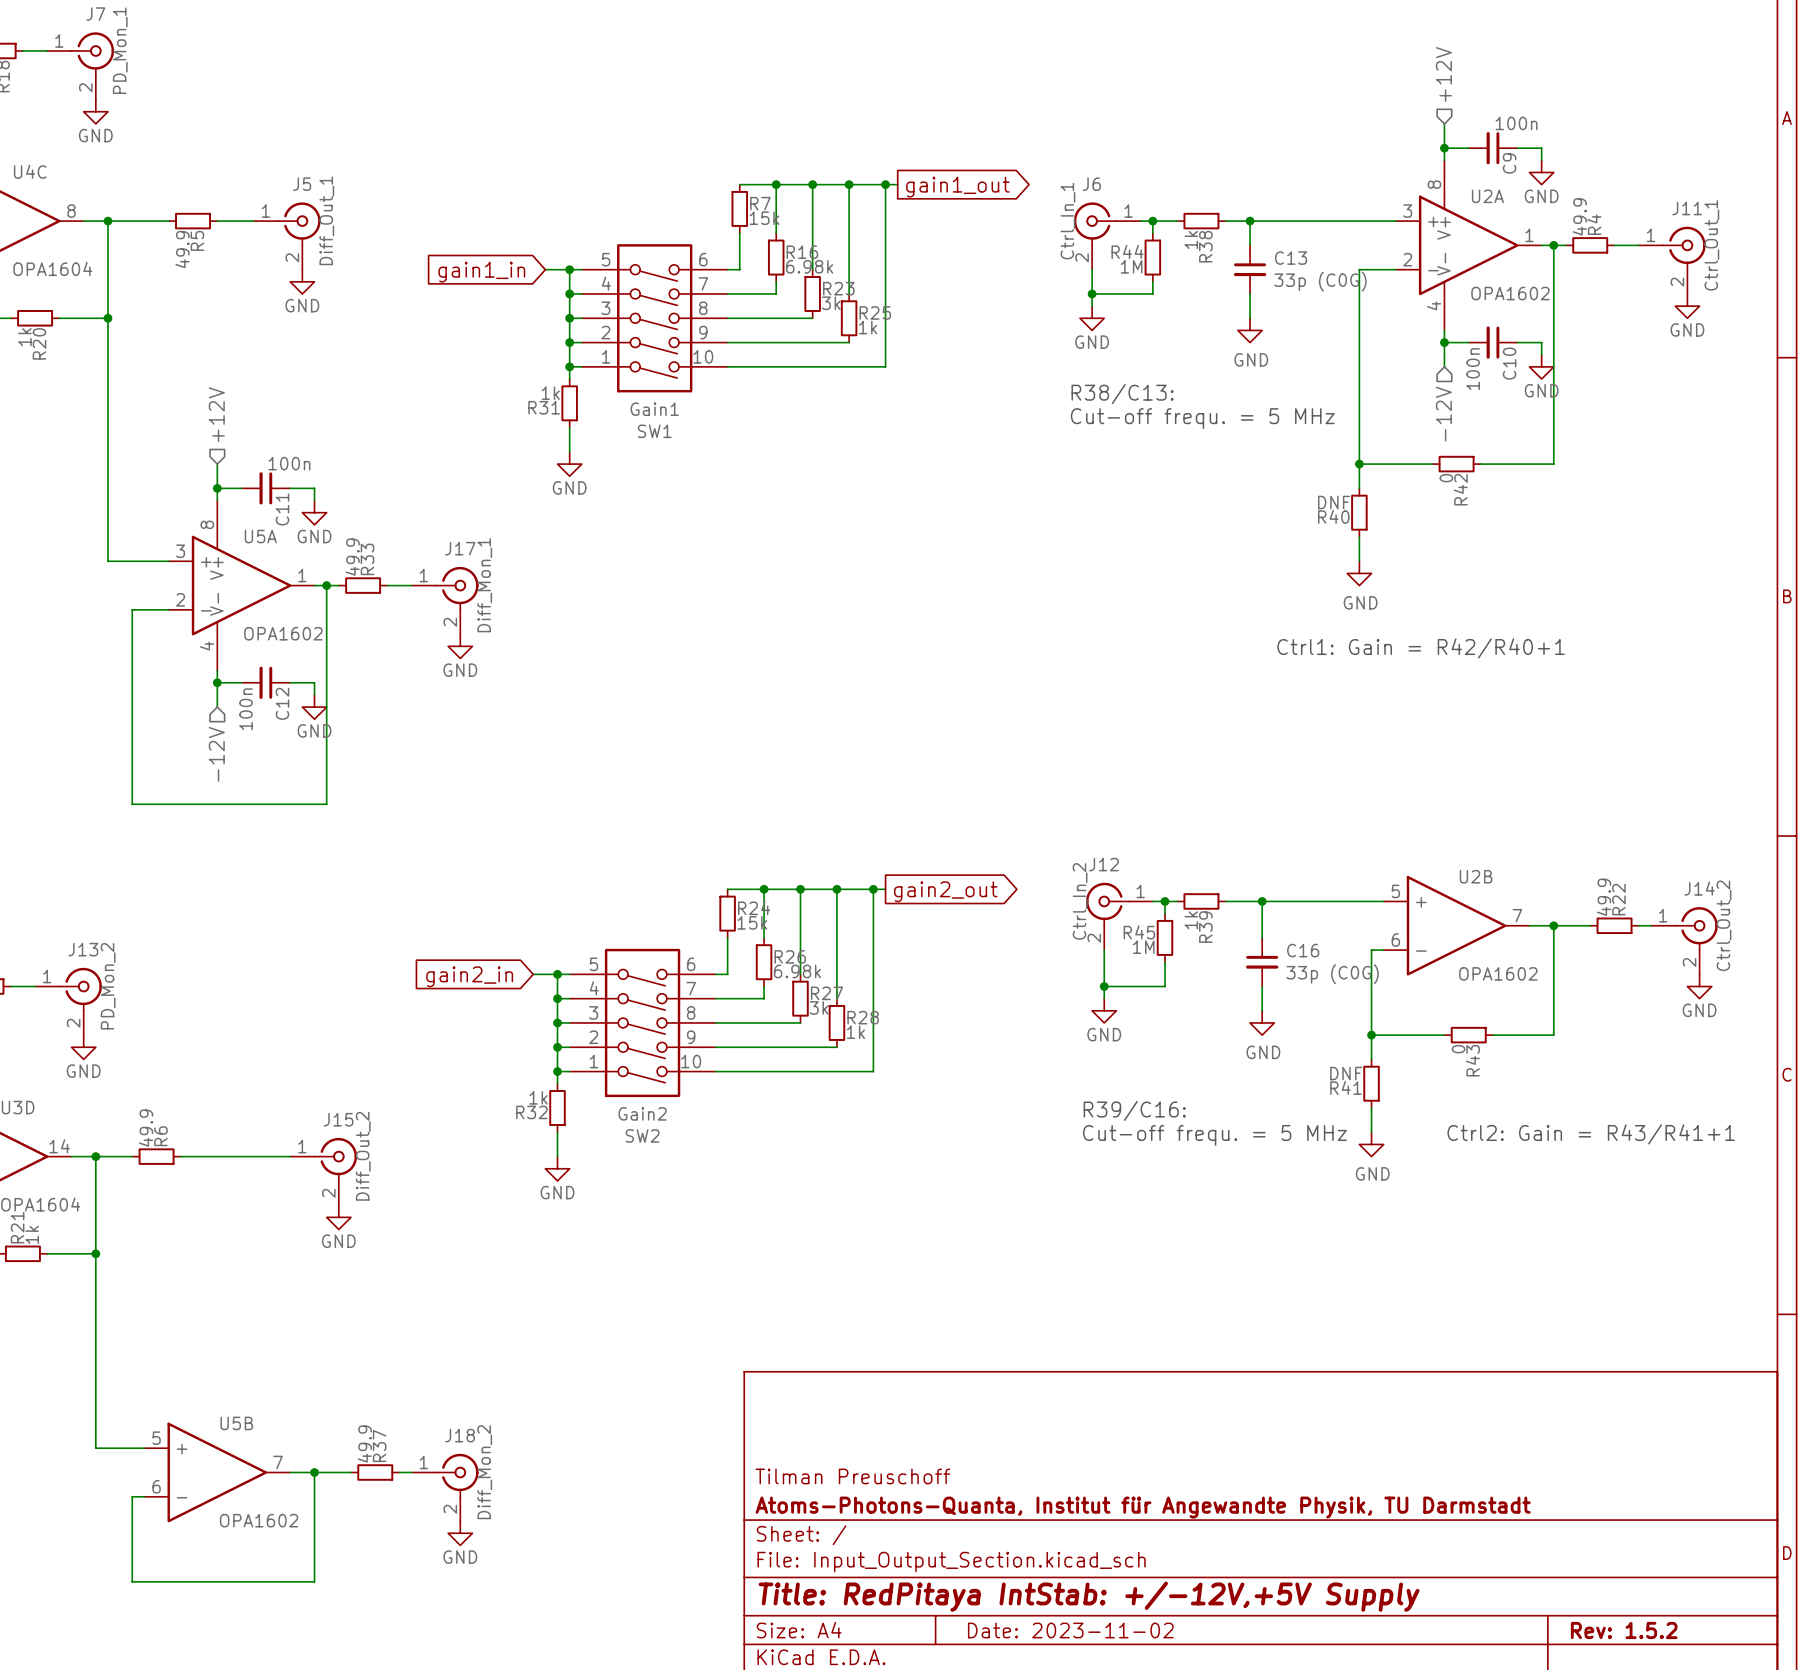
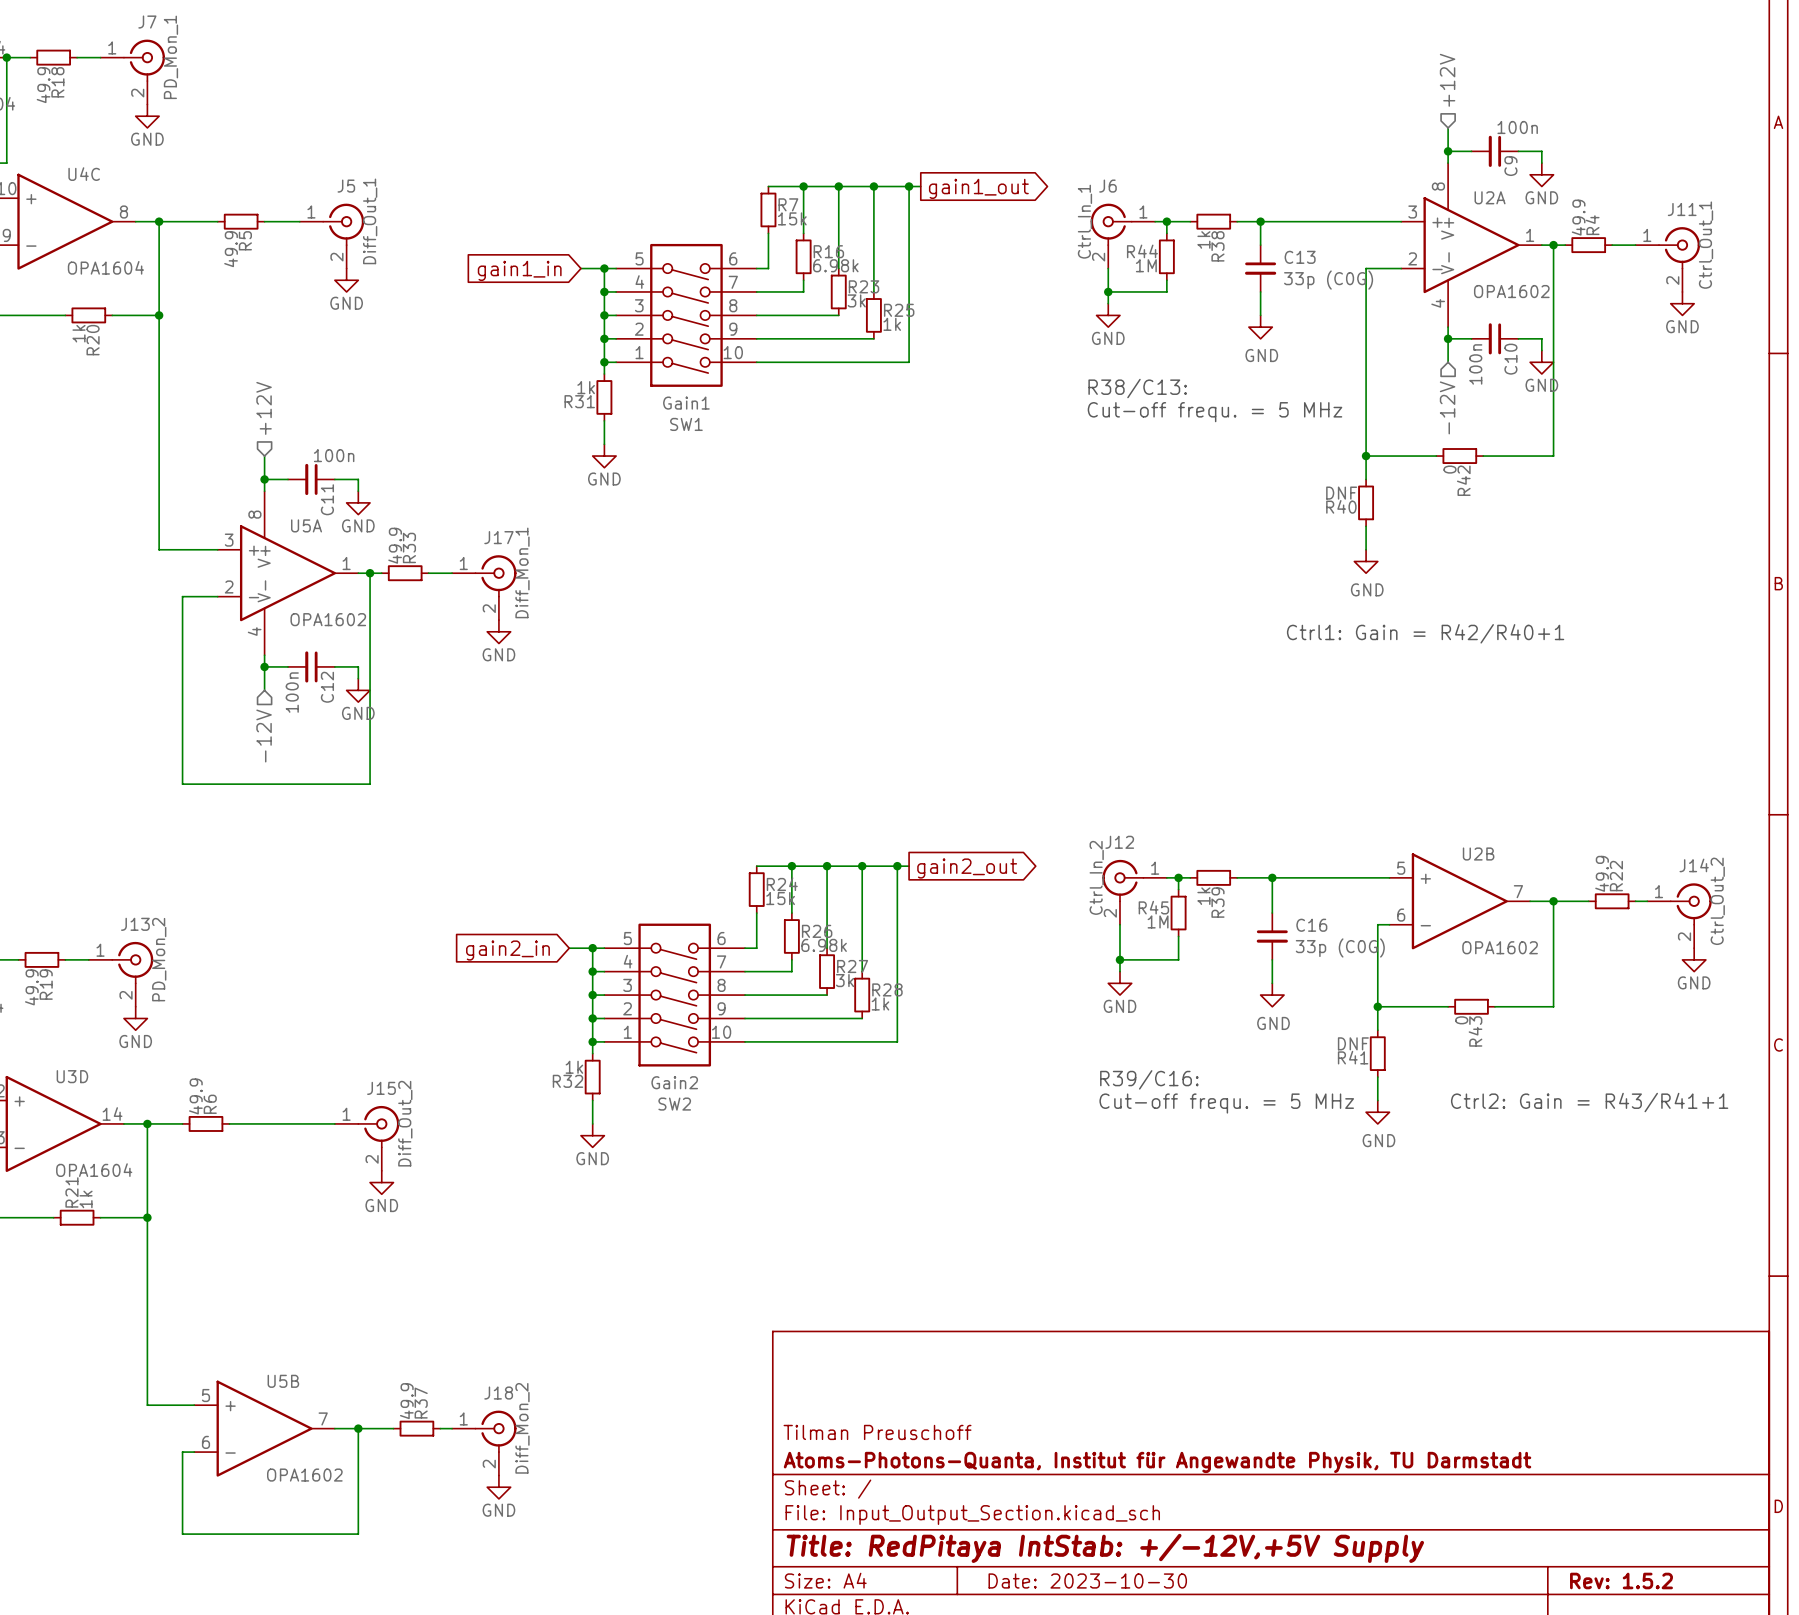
title block: Date: 2023-11-02 (1070, 1630) -> Date: 2023-10-30 (1087, 1580)

